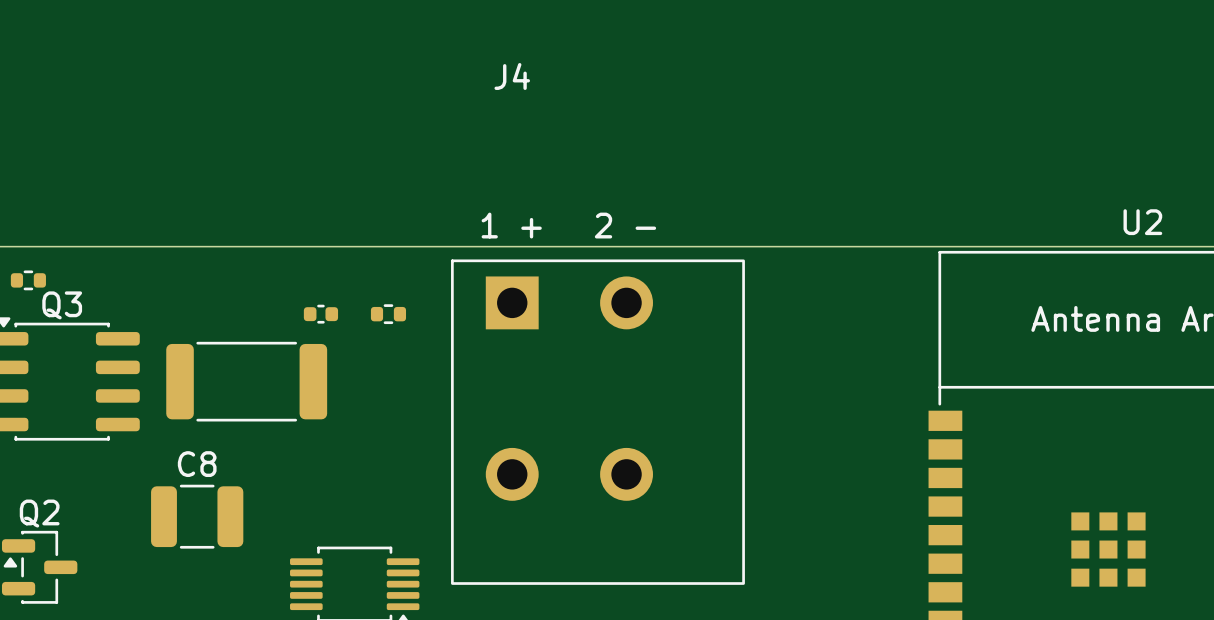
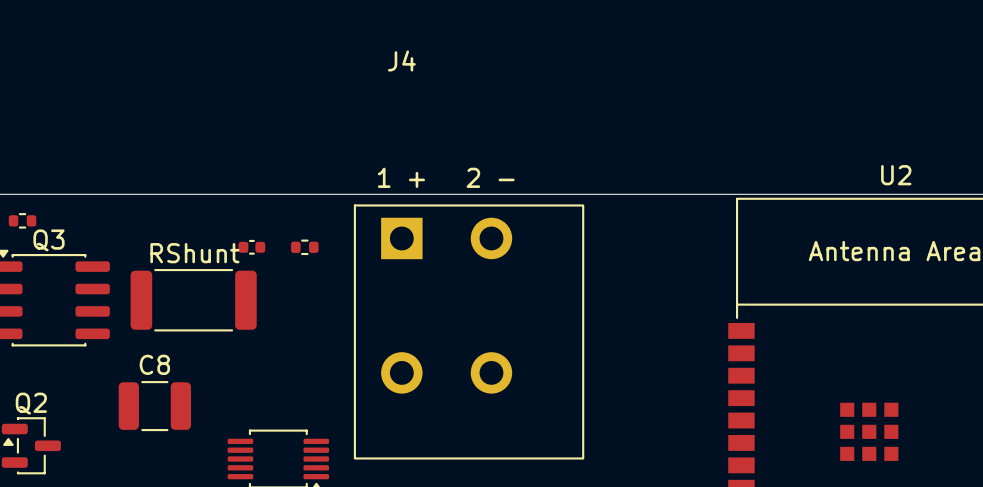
RShunt name: none -> RShunt (194, 253)

